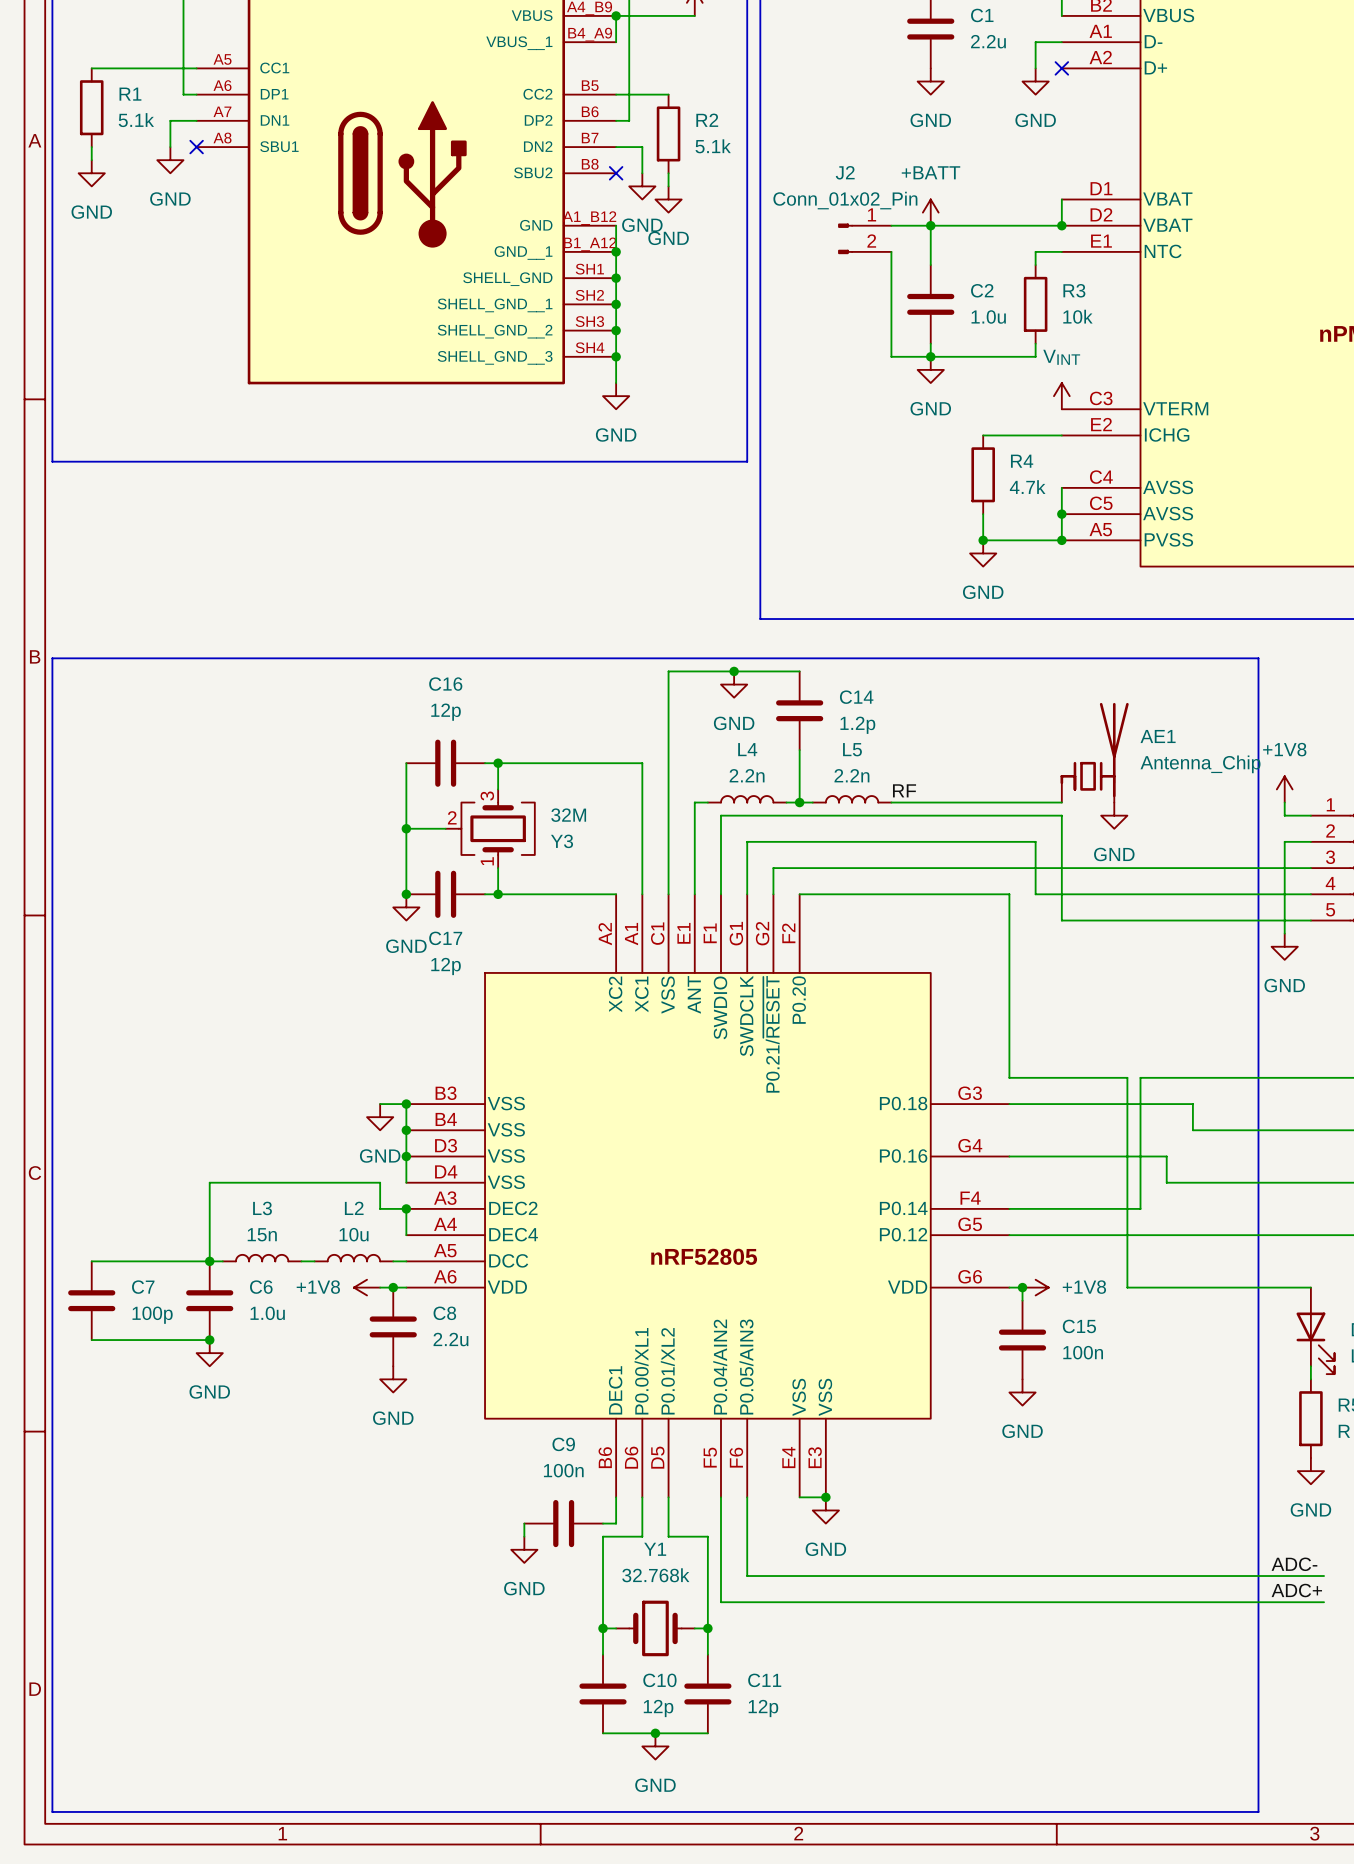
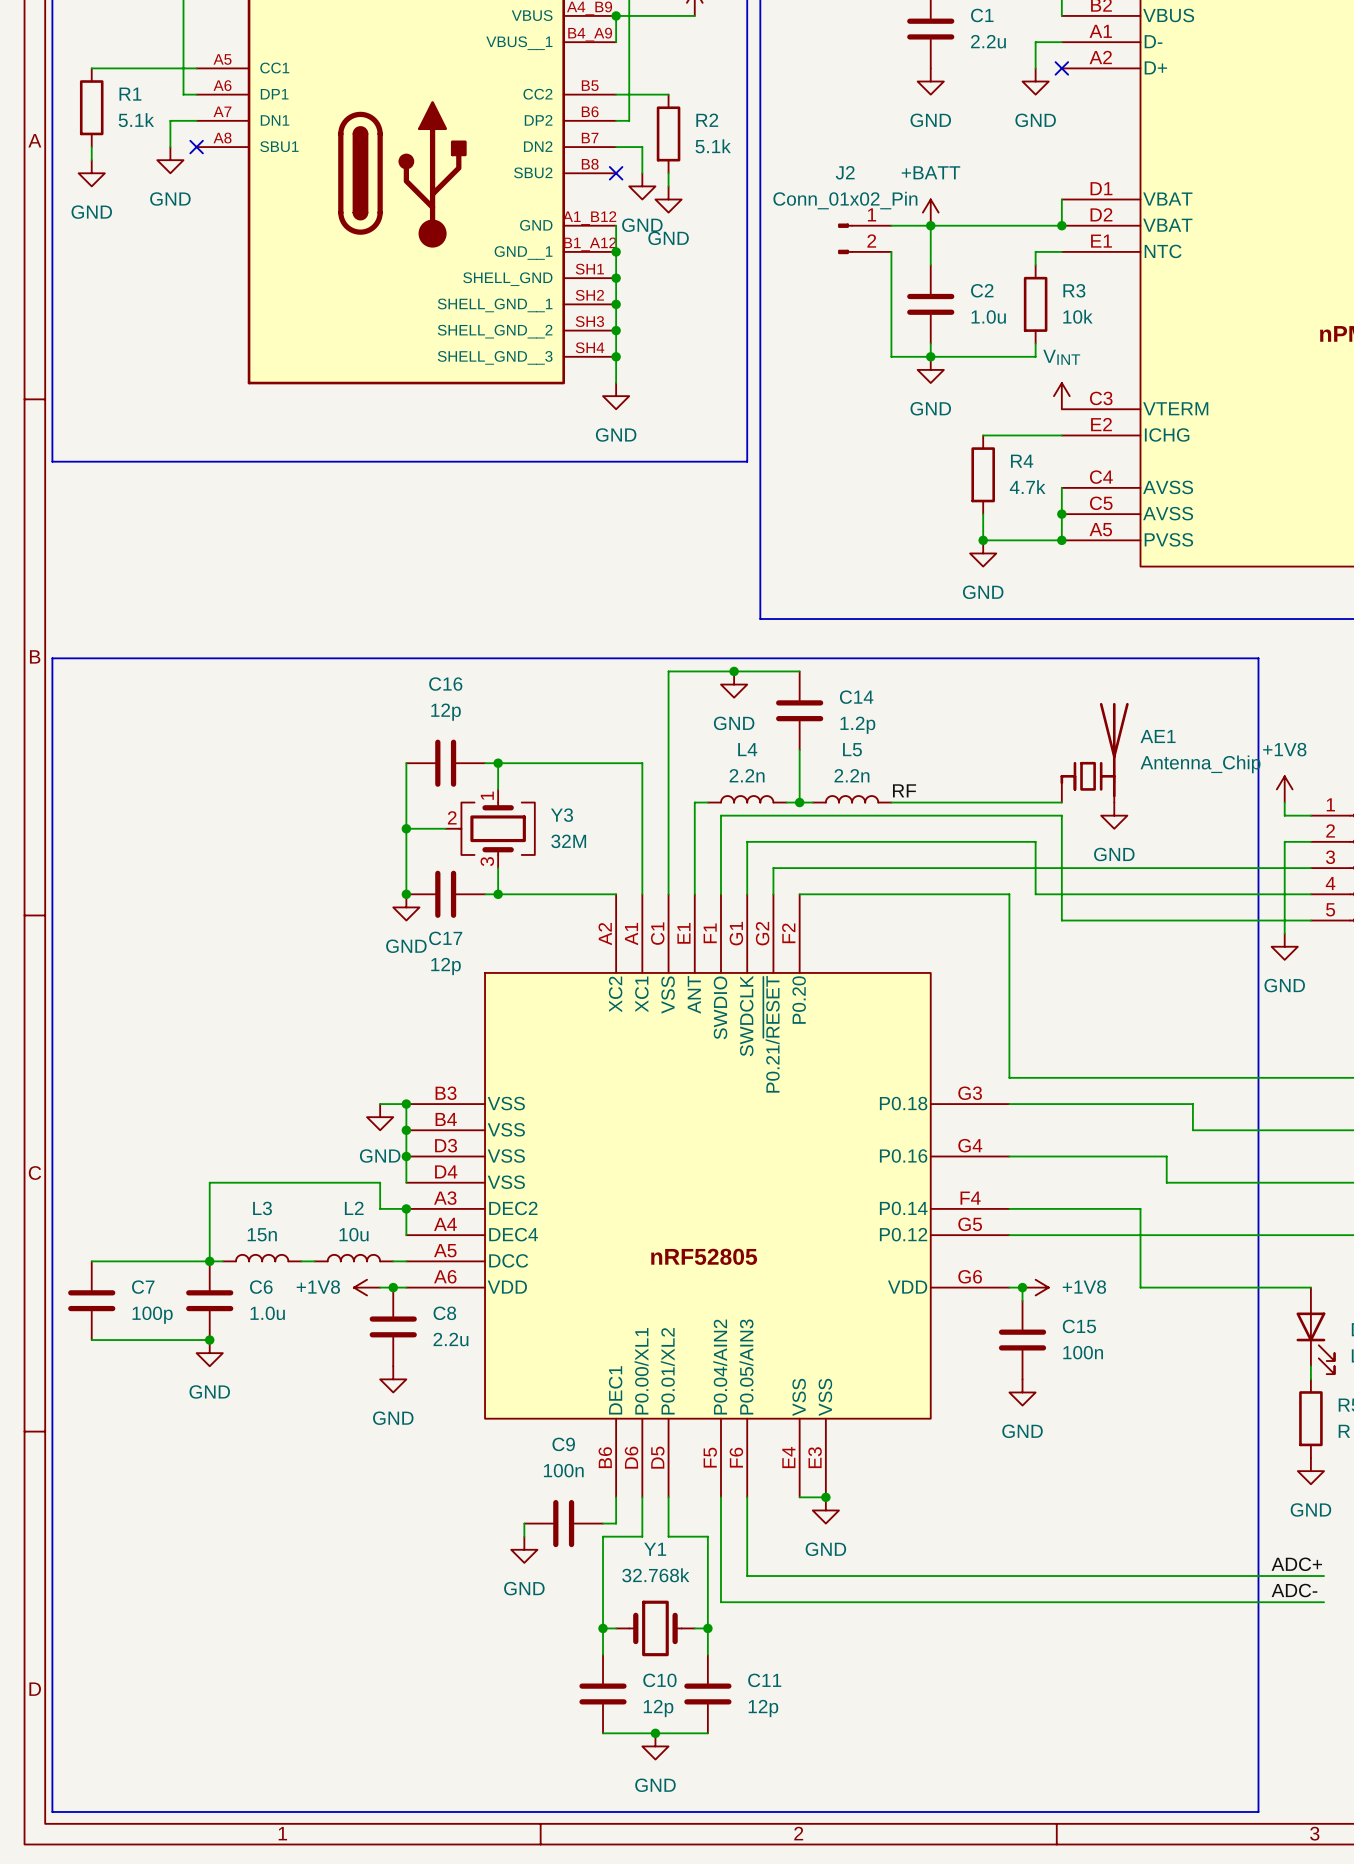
Y3 flip: as is (496, 828) -> up-down (496, 828)
wire: (1127, 1077) (1127, 1287) (1140, 1287) -> (1140, 1208) (1140, 1287)
wire: (1140, 1077) (1140, 1208) -> (1140, 1077) (1127, 1077)
label: ADC- (1294, 1564) -> ADC+ (1296, 1564)
label: ADC+ (1296, 1590) -> ADC- (1294, 1590)

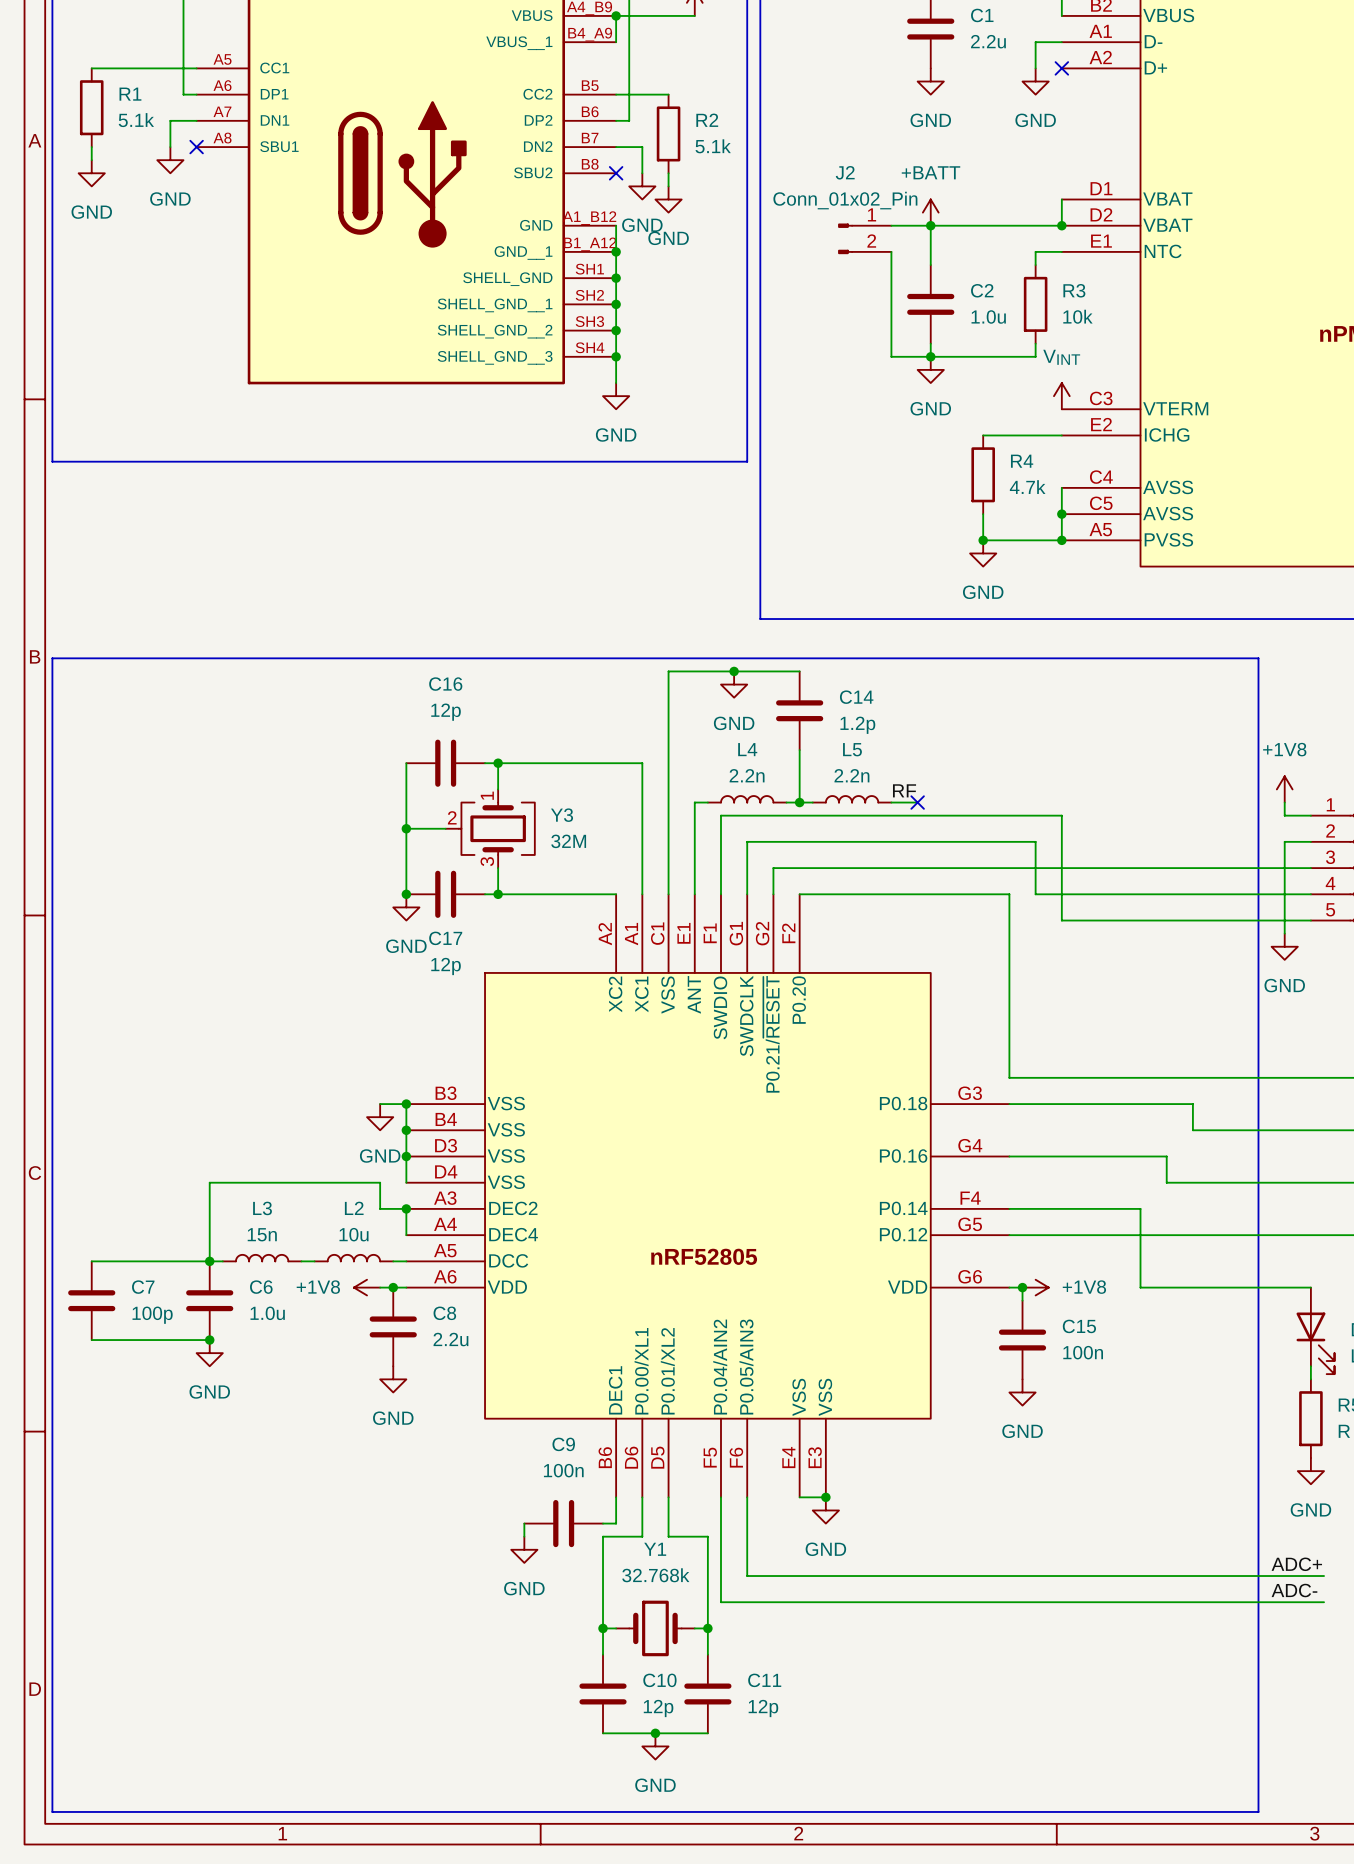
AE1: Antenna_Chip (1094, 752) -> none
wire: (917, 802) (1061, 802) -> none
no-connect mark: none -> (917, 802)
power symbol: GND (1114, 815) -> none

